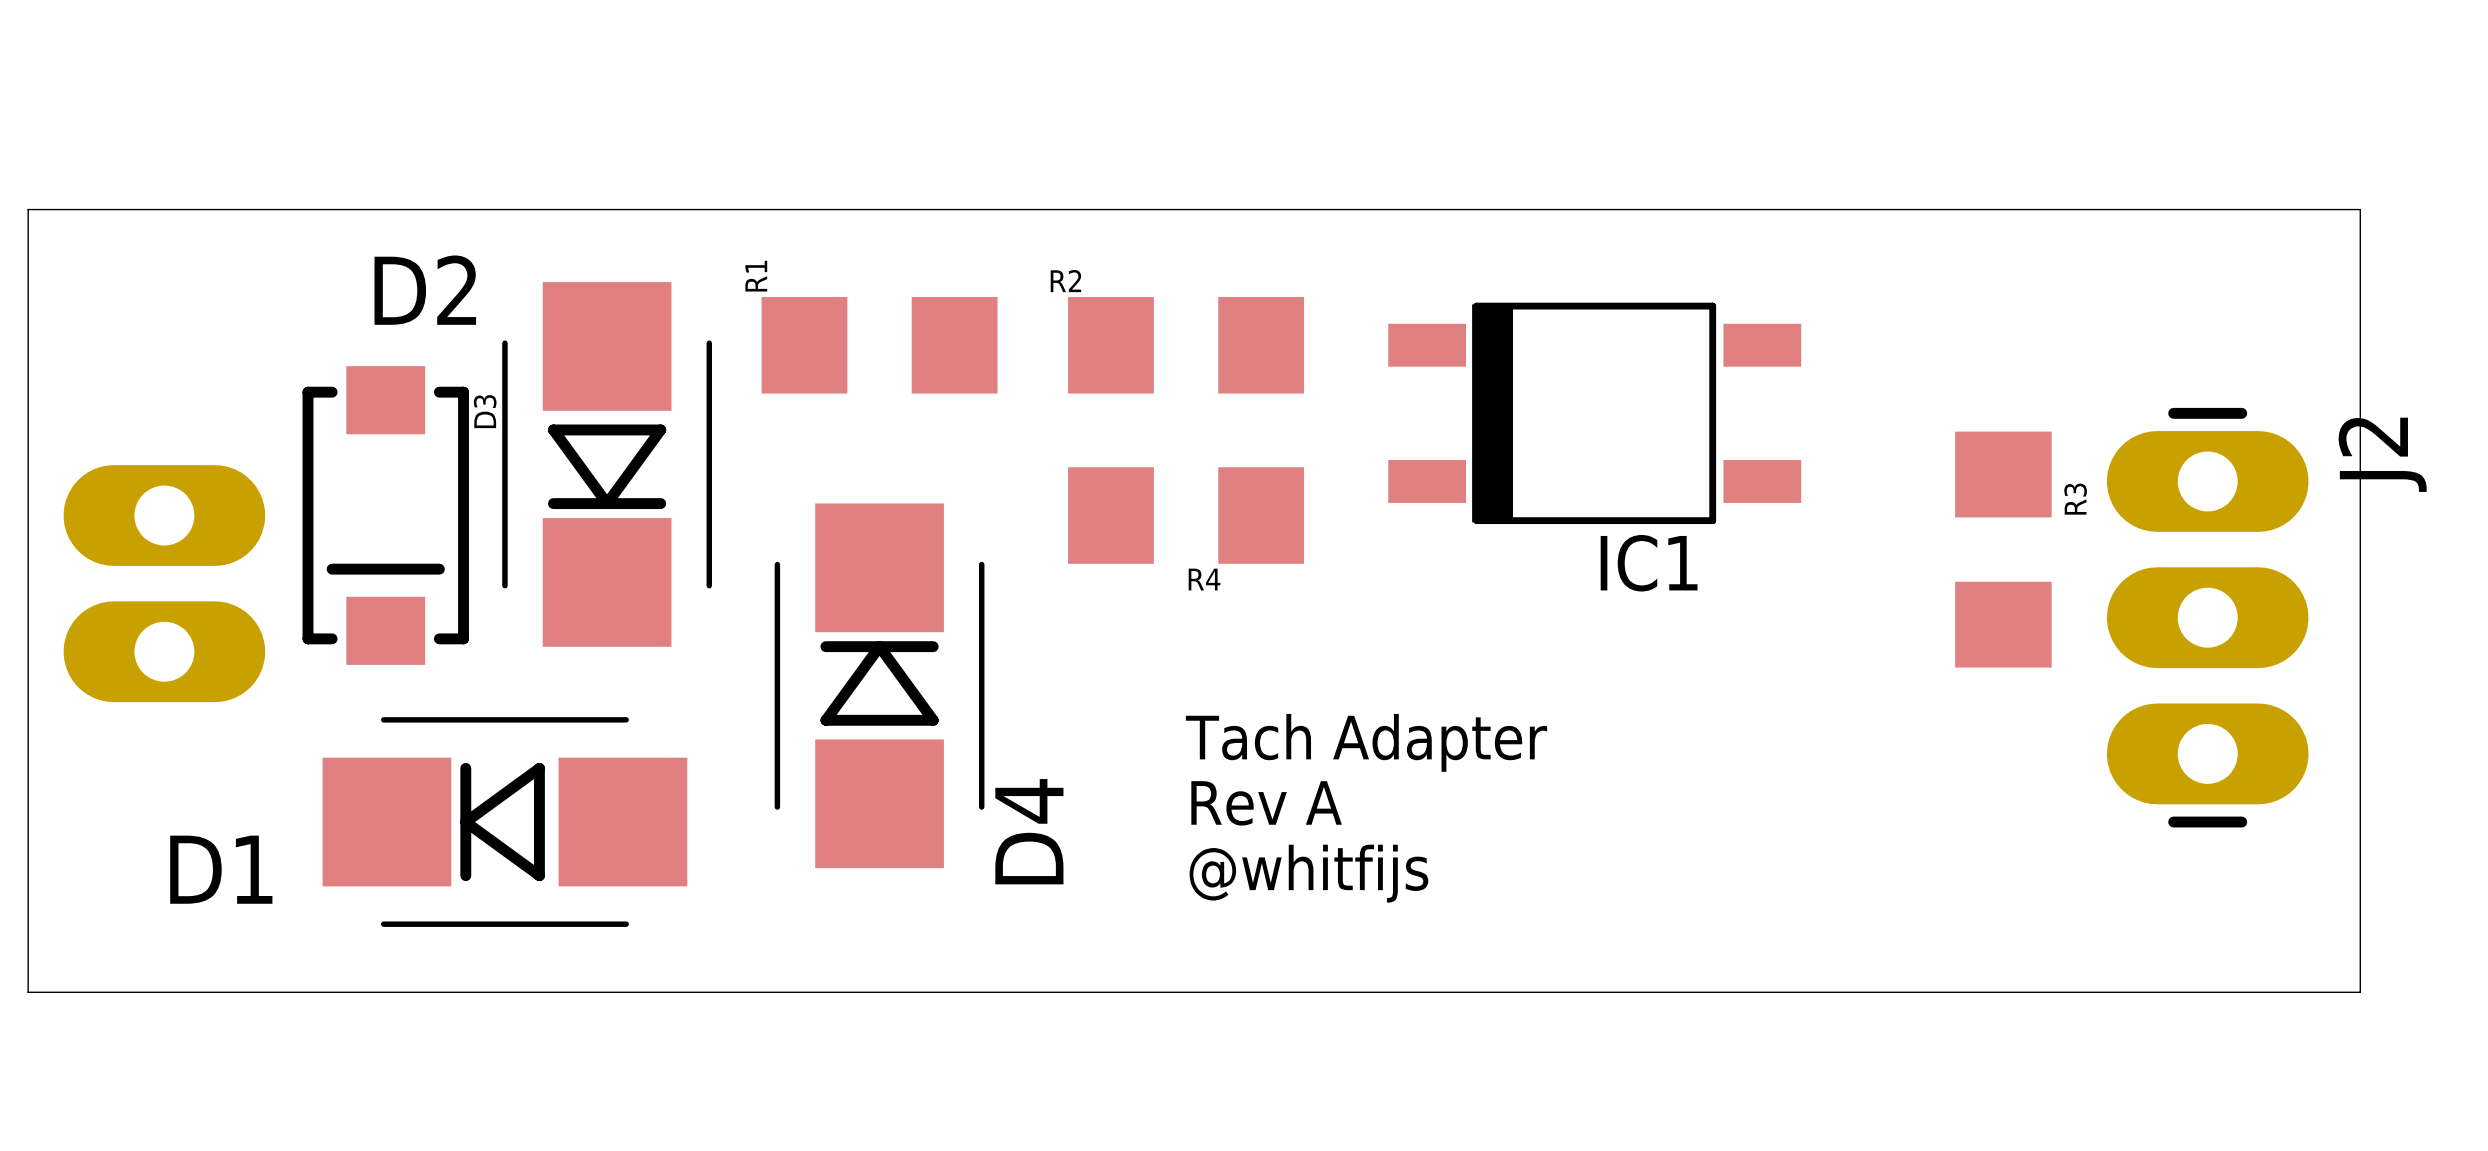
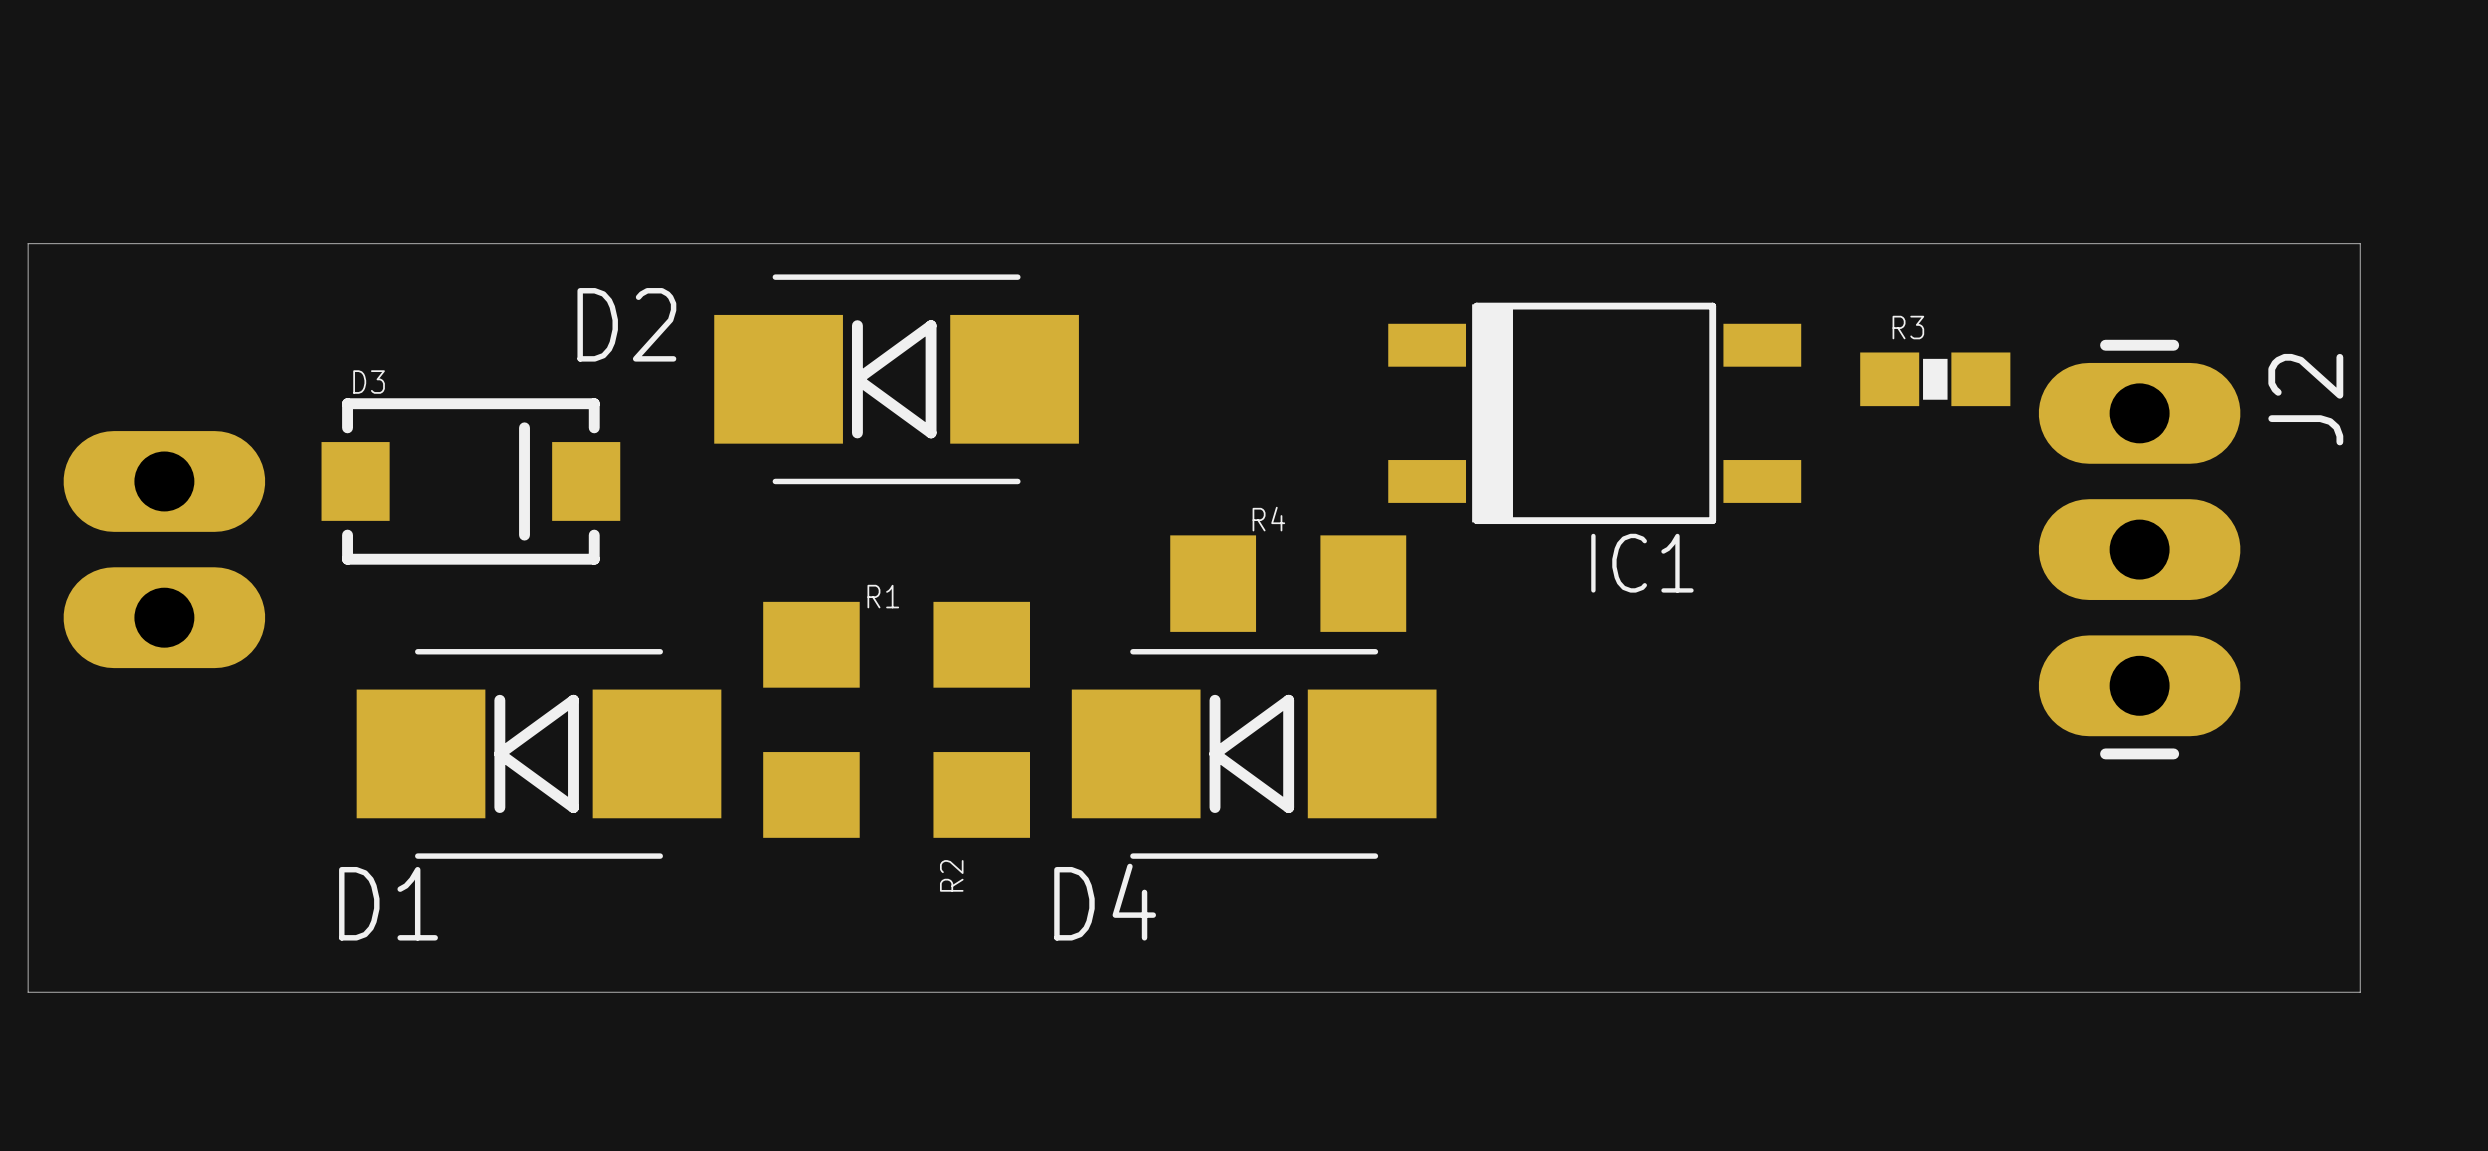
board edge: (28, 243) (28, 209) (2360, 209) (2360, 243) -> (28, 243) (2360, 243)
R2 name position: R2 (1065, 281) -> R2 (951, 875)
D2 name position: D2 (425, 290) -> D2 (626, 324)
R1 rotation: 0° (879, 345) -> 90° clockwise (811, 719)
R1 position: (879, 345) -> (811, 719)
R2 rotation: 0° (1186, 345) -> 90° clockwise (981, 719)
R2 position: (1186, 345) -> (981, 719)
R3 footprint: [1955, 431, 2052, 668] -> [1860, 352, 2011, 407]
D2 rotation: 0° (607, 464) -> 90° clockwise (896, 379)
D2 position: (607, 464) -> (896, 379)
D3 rotation: 0° (385, 515) -> 90° counterclockwise (470, 481)
R4 position: (1186, 515) -> (1288, 583)
R4 name position: R4 (1204, 579) -> R4 (1268, 519)
part position: (164, 583) -> (164, 549)
J2 position: (2207, 617) -> (2139, 549)
D4 rotation: 0° (879, 685) -> 90° counterclockwise (1254, 753)
D4 position: (879, 685) -> (1254, 753)
text: Tach Adapter (1366, 742) -> none
text: Rev A (1266, 803) -> none
D1 position: (504, 822) -> (539, 753)
D4 name position: D4 (1029, 831) -> D4 (1105, 902)
D1 name position: D1 (221, 869) -> D1 (388, 903)
text: @whitfijs (1308, 873) -> none

